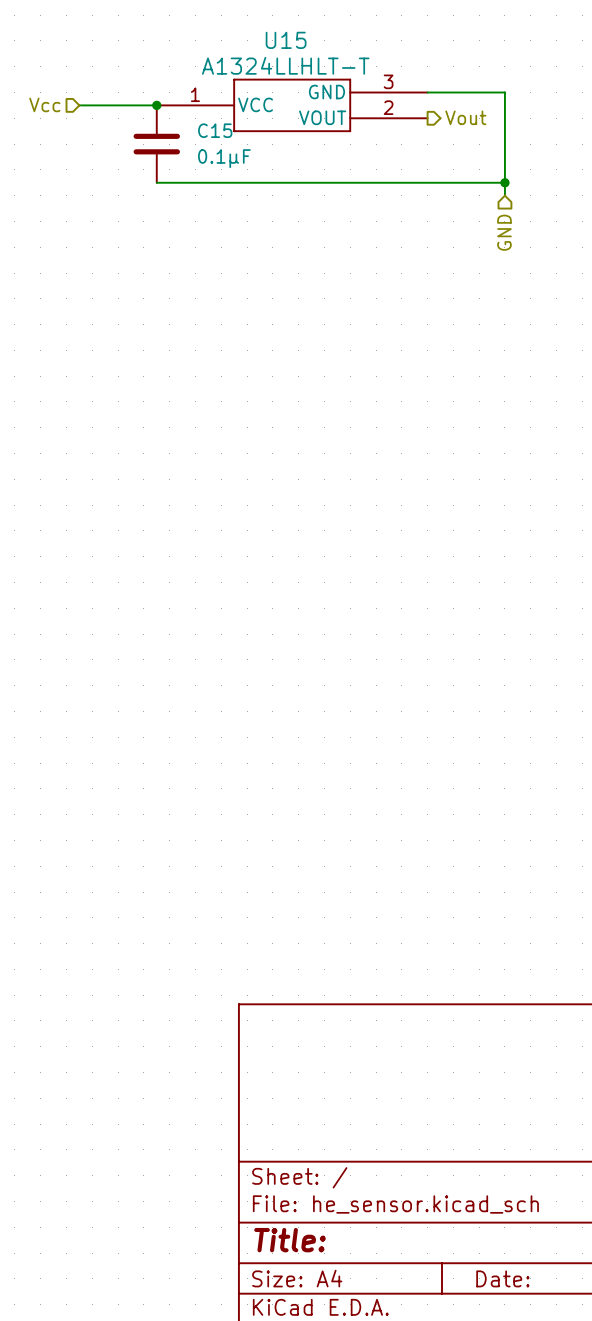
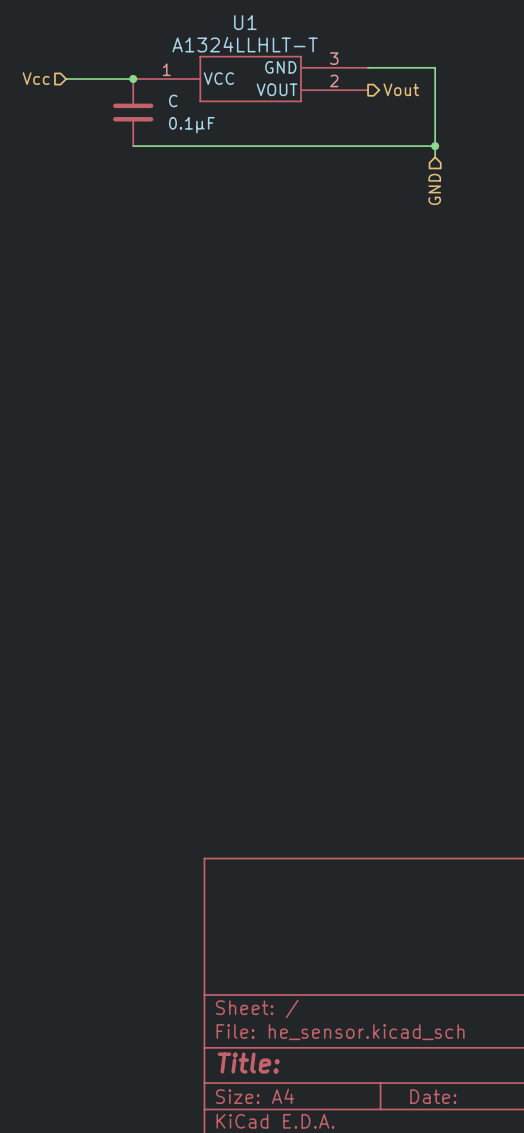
U15 name: U15 (286, 40) -> U1 (245, 22)
C15 name: C15 (215, 130) -> C (173, 100)

